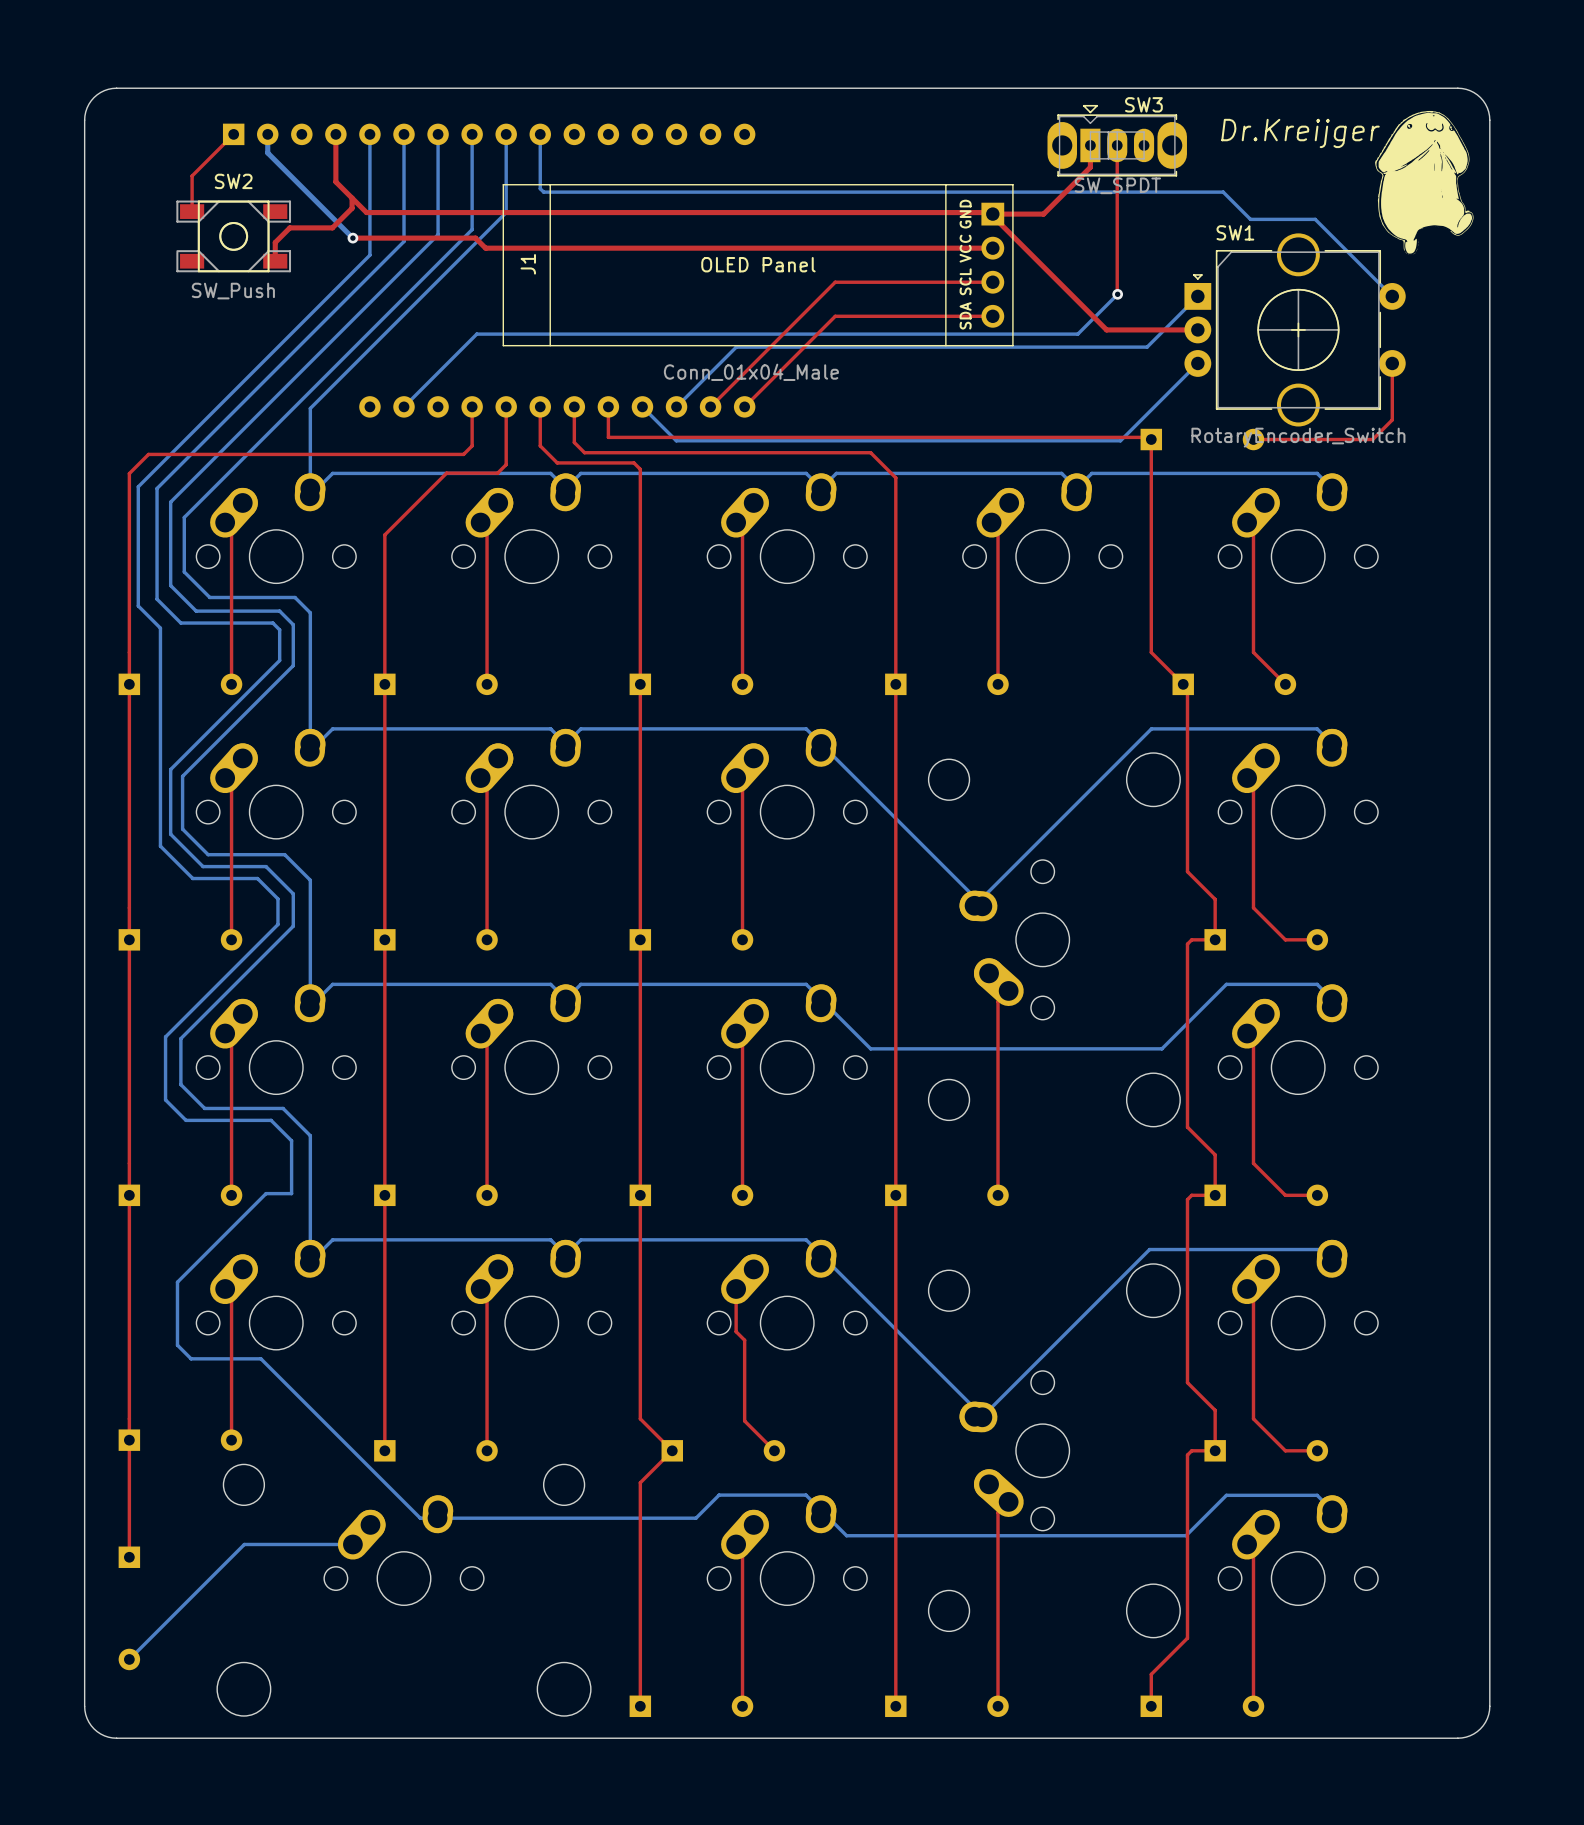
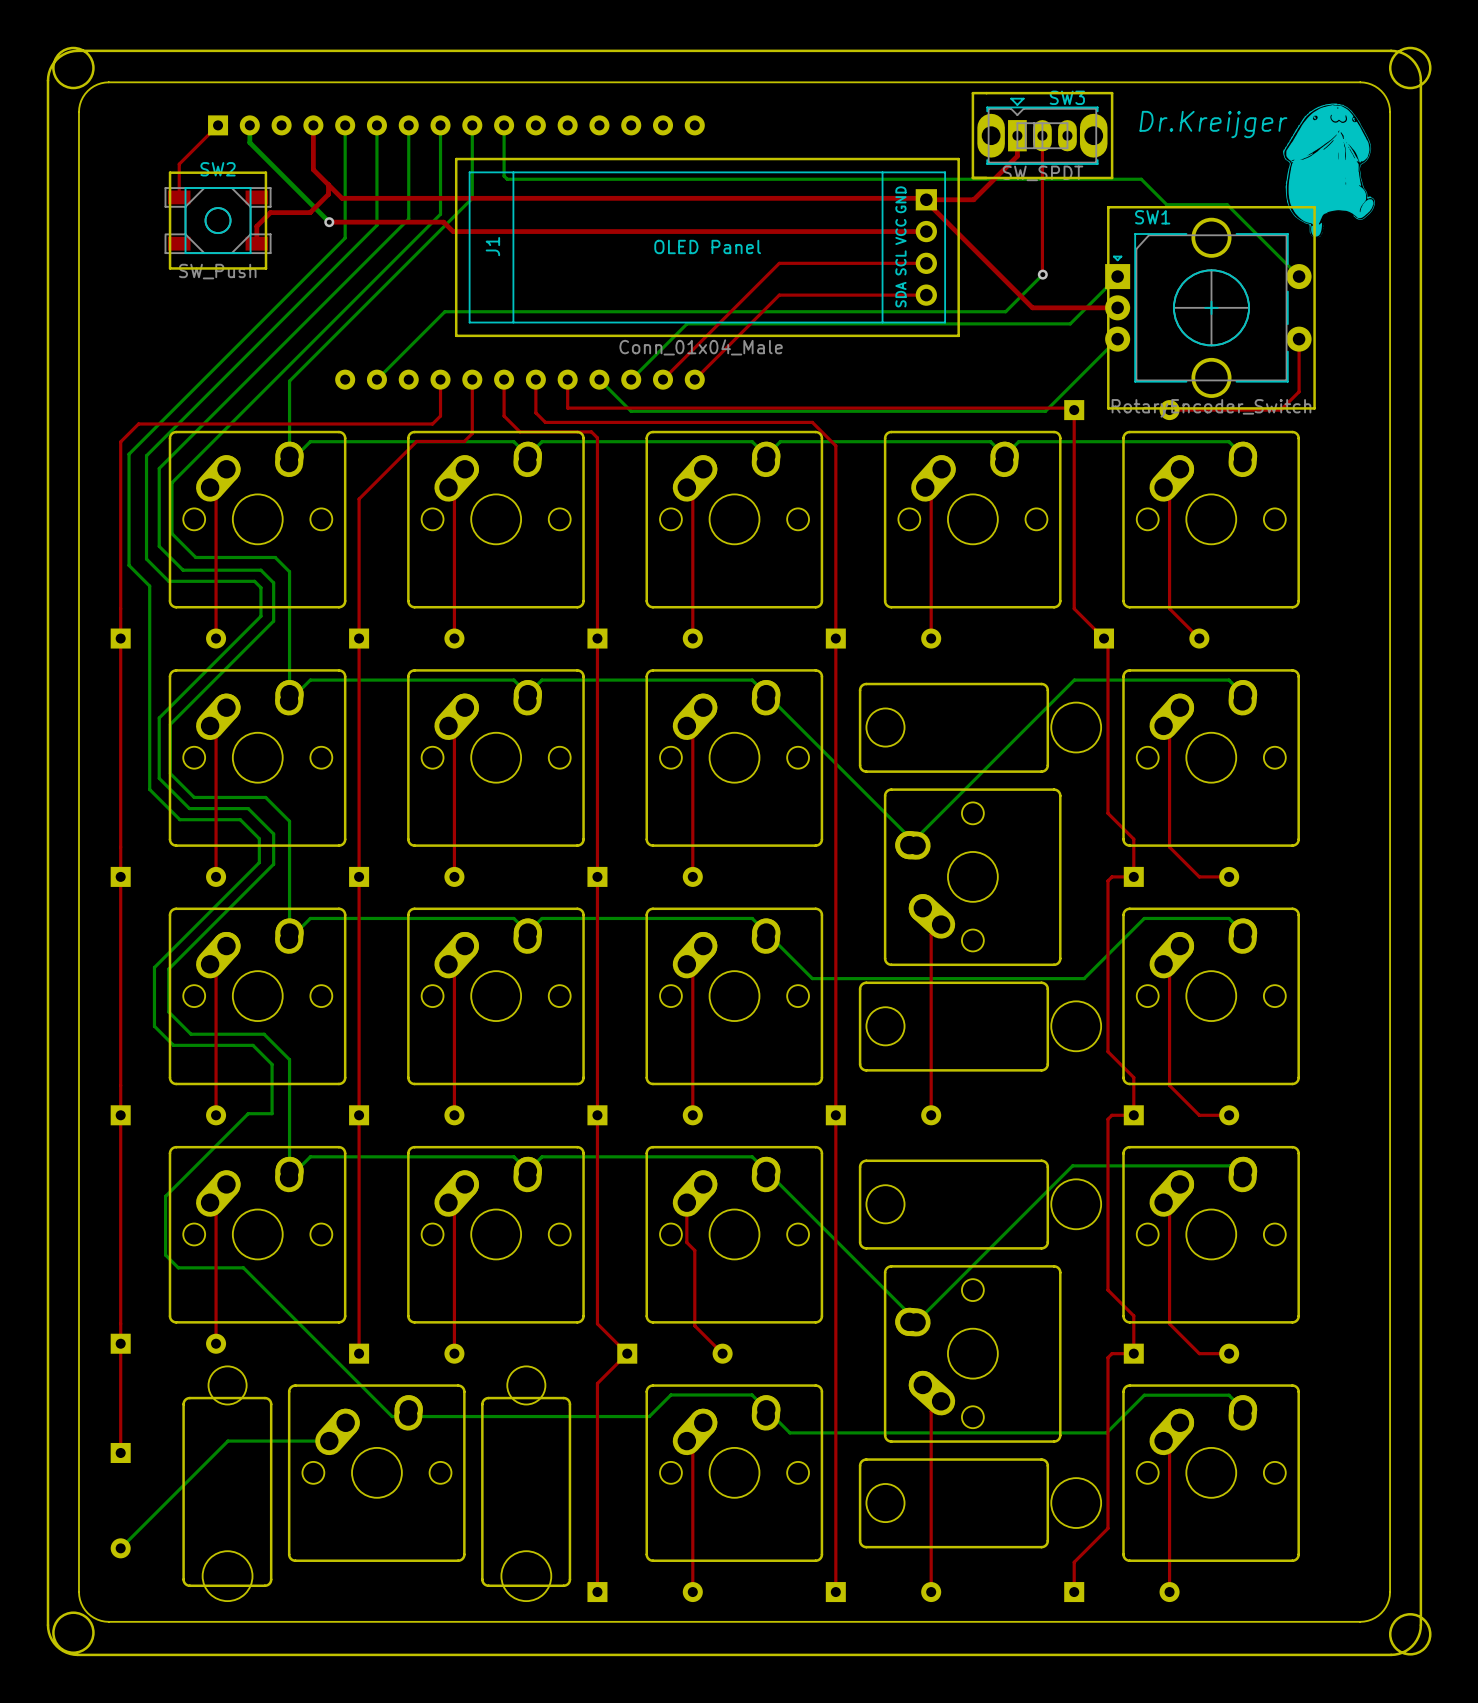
round board edge: none -> [52, 46, 95, 90]
round board edge: none -> [1388, 46, 1432, 90]
board edge: none -> (77, 50) (1391, 50) (1405, 54) (1414, 62) (1419, 72) (1420, 80) (1420, 1625) (1416, 1640) (1409, 1648) (1402, 1652) (1391, 1654) (77, 1654) (66, 1652) (54, 1643) (50, 1636) (47, 1625) (47, 80) (50, 69) (56, 59) (66, 53) (77, 50)
board edge: none -> (972, 93) (1112, 93) (1112, 177) (972, 177) (972, 93)
board edge: none -> (958, 159) (456, 159) (456, 335)
board edge: none -> (958, 159) (958, 335) (456, 335)
board edge: none -> (1108, 207) (1314, 207) (1314, 408) (1108, 408) (1108, 207)
board edge: none -> (170, 268) (170, 172) (265, 172) (266, 268) (170, 268)
board edge: none -> (176, 432) (338, 432) (343, 433) (345, 438) (345, 600) (343, 605) (338, 607) (176, 607) (171, 605) (169, 600) (169, 438) (171, 433) (176, 432)
board edge: none -> (414, 432) (577, 432) (581, 433) (583, 438) (583, 600) (581, 605) (577, 607) (414, 607) (410, 605) (408, 600) (408, 438) (410, 433) (414, 432)
board edge: none -> (653, 432) (815, 432) (820, 433) (821, 438) (821, 600) (820, 605) (815, 607) (653, 607) (648, 605) (646, 600) (646, 438) (648, 433) (653, 432)
board edge: none -> (891, 432) (1054, 432) (1058, 433) (1060, 438) (1060, 600) (1058, 605) (1054, 607) (891, 607) (886, 605) (885, 600) (885, 438) (886, 433) (891, 432)
board edge: none -> (1129, 432) (1292, 432) (1296, 433) (1298, 438) (1298, 600) (1296, 605) (1292, 607) (1129, 607) (1125, 605) (1123, 600) (1123, 438) (1125, 433) (1129, 432)
board edge: none -> (176, 670) (338, 670) (343, 672) (345, 676) (345, 839) (343, 843) (338, 845) (176, 845) (171, 843) (169, 839) (169, 676) (171, 672) (176, 670)
board edge: none -> (414, 670) (577, 670) (581, 672) (583, 676) (583, 839) (581, 843) (577, 845) (414, 845) (410, 843) (408, 839) (408, 676) (410, 672) (414, 670)
board edge: none -> (653, 670) (815, 670) (820, 672) (821, 676) (821, 839) (820, 843) (815, 845) (653, 845) (648, 843) (646, 839) (646, 676) (648, 672) (653, 670)
board edge: none -> (1129, 670) (1292, 670) (1296, 672) (1298, 676) (1298, 839) (1296, 843) (1292, 845) (1129, 845) (1125, 843) (1123, 839) (1123, 676) (1125, 672) (1129, 670)
board edge: none -> (866, 684) (1043, 684) (1047, 690) (1047, 767) (1041, 771) (863, 771) (860, 765) (860, 690) (861, 685) (866, 684)
board edge: none -> (891, 789) (1054, 789) (1058, 791) (1060, 795) (1060, 958) (1058, 962) (1054, 964) (891, 964) (886, 962) (885, 958) (885, 795) (886, 791) (891, 789)
board edge: none -> (176, 908) (338, 908) (343, 910) (345, 915) (345, 1077) (343, 1082) (338, 1083) (176, 1083) (171, 1082) (169, 1077) (169, 915) (171, 910) (176, 908)
board edge: none -> (414, 908) (577, 908) (581, 910) (583, 915) (583, 1077) (581, 1082) (577, 1083) (414, 1083) (410, 1082) (408, 1077) (408, 915) (410, 910) (414, 908)
board edge: none -> (653, 908) (815, 908) (820, 910) (821, 915) (821, 1077) (820, 1082) (815, 1083) (653, 1083) (648, 1082) (646, 1077) (646, 915) (648, 910) (653, 908)
board edge: none -> (1129, 908) (1292, 908) (1296, 910) (1298, 915) (1298, 1077) (1296, 1082) (1292, 1083) (1129, 1083) (1125, 1082) (1123, 1077) (1123, 915) (1125, 910) (1129, 908)
board edge: none -> (866, 982) (1043, 983) (1047, 989) (1047, 1066) (1041, 1070) (863, 1069) (860, 1064) (860, 989) (861, 984) (866, 982)
board edge: none -> (176, 1147) (338, 1147) (343, 1149) (345, 1153) (345, 1316) (343, 1320) (338, 1322) (176, 1322) (171, 1320) (169, 1316) (169, 1153) (171, 1149) (176, 1147)
board edge: none -> (414, 1147) (577, 1147) (581, 1149) (583, 1153) (583, 1316) (581, 1320) (577, 1322) (414, 1322) (410, 1320) (408, 1316) (408, 1153) (410, 1149) (414, 1147)
board edge: none -> (653, 1147) (815, 1147) (820, 1149) (821, 1153) (821, 1316) (820, 1320) (815, 1322) (653, 1322) (648, 1320) (646, 1316) (646, 1153) (648, 1149) (653, 1147)
board edge: none -> (1129, 1147) (1292, 1147) (1296, 1149) (1298, 1153) (1298, 1316) (1296, 1320) (1292, 1322) (1129, 1322) (1125, 1320) (1123, 1316) (1123, 1153) (1125, 1149) (1129, 1147)
board edge: none -> (866, 1160) (1043, 1161) (1047, 1167) (1047, 1244) (1041, 1248) (863, 1247) (860, 1242) (860, 1167) (861, 1162) (866, 1160)
board edge: none -> (891, 1266) (1054, 1266) (1058, 1268) (1060, 1272) (1060, 1435) (1058, 1439) (1054, 1441) (891, 1441) (886, 1439) (885, 1435) (885, 1272) (886, 1268) (891, 1266)
board edge: none -> (295, 1385) (458, 1385) (462, 1387) (464, 1391) (464, 1554) (462, 1558) (458, 1560) (295, 1560) (291, 1558) (289, 1554) (289, 1391) (291, 1387) (295, 1385)
board edge: none -> (653, 1385) (815, 1385) (820, 1387) (821, 1391) (821, 1554) (820, 1558) (815, 1560) (653, 1560) (648, 1558) (646, 1554) (646, 1391) (648, 1387) (653, 1385)
board edge: none -> (1129, 1385) (1292, 1385) (1296, 1387) (1298, 1391) (1298, 1554) (1296, 1558) (1292, 1560) (1129, 1560) (1125, 1558) (1123, 1554) (1123, 1391) (1125, 1387) (1129, 1385)
board edge: none -> (189, 1398) (264, 1398) (270, 1401) (271, 1579) (267, 1585) (189, 1585) (184, 1581) (183, 1404) (185, 1399) (189, 1398)
board edge: none -> (488, 1398) (563, 1398) (569, 1401) (569, 1579) (566, 1585) (488, 1585) (482, 1581) (482, 1404) (484, 1399) (488, 1398)
board edge: none -> (866, 1459) (1043, 1460) (1047, 1465) (1047, 1543) (1041, 1547) (863, 1546) (860, 1540) (860, 1465) (861, 1461) (866, 1459)
round board edge: none -> [52, 1611, 95, 1655]
round board edge: none -> [1388, 1613, 1432, 1656]

